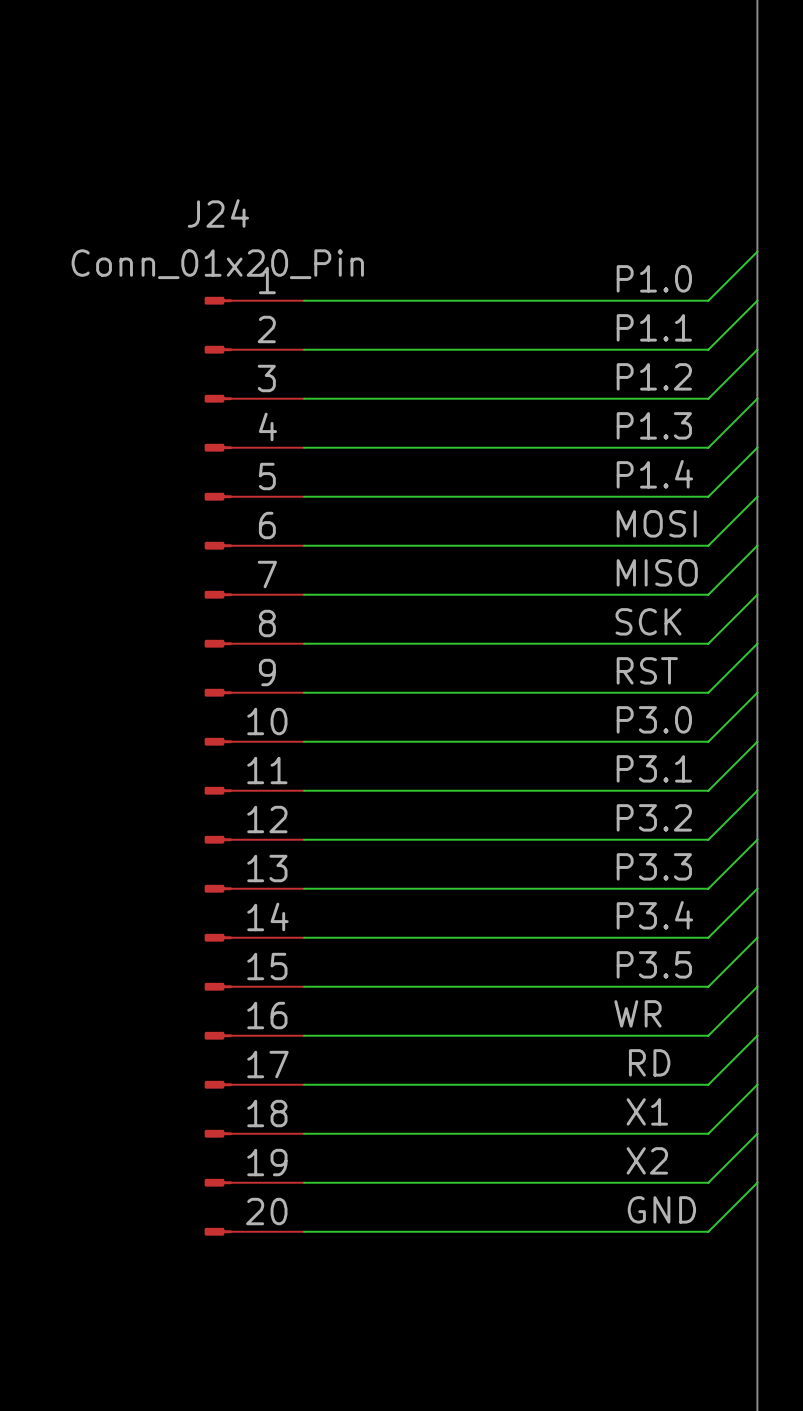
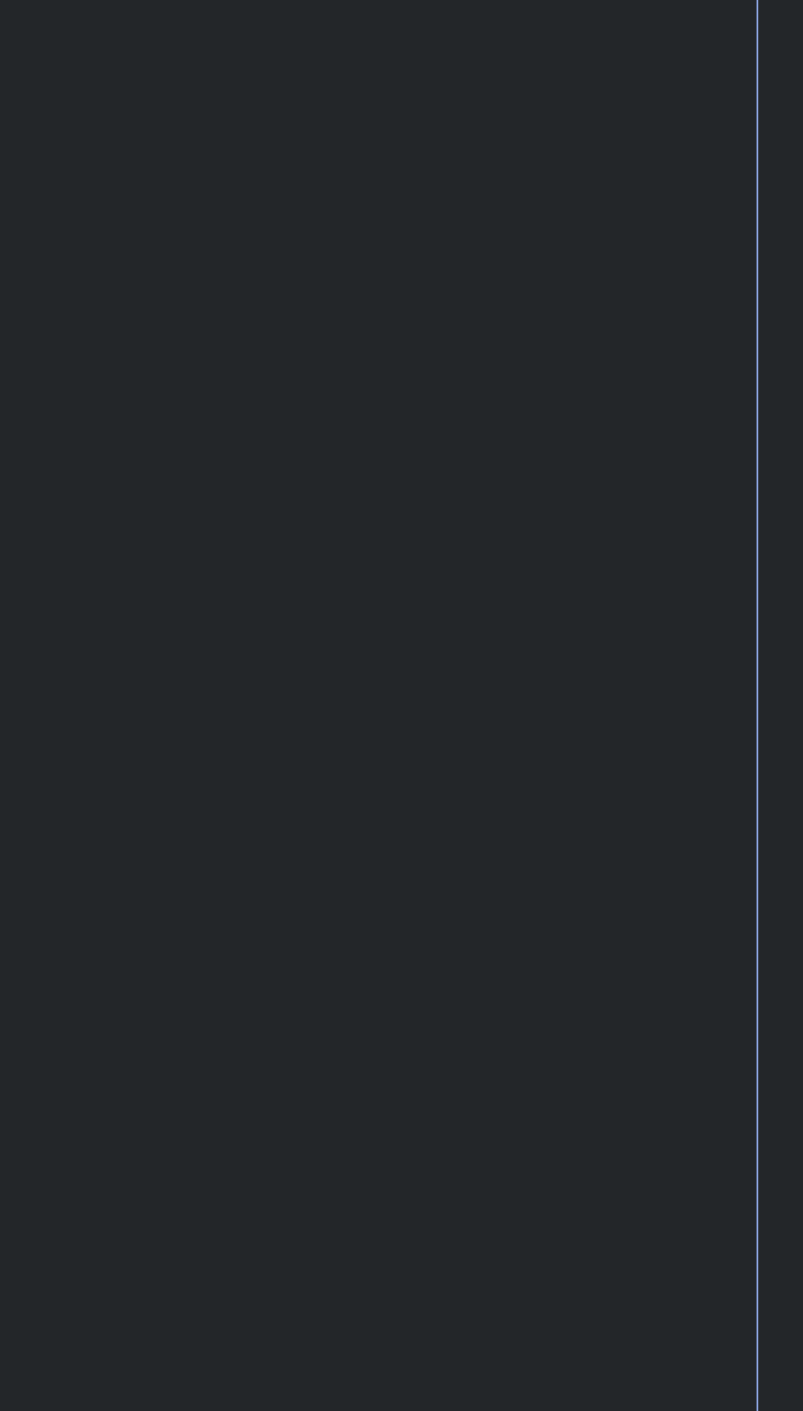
wire: (757, 251) (708, 300) (304, 300) -> none
label: P1.0 (654, 278) -> none
wire: (757, 300) (708, 349) (304, 349) -> none
label: P1.1 (654, 327) -> none
wire: (757, 349) (708, 398) (304, 398) -> none
label: P1.2 (654, 376) -> none
wire: (757, 398) (708, 447) (304, 447) -> none
label: P1.3 (654, 425) -> none
wire: (757, 447) (708, 496) (304, 496) -> none
label: P1.4 (654, 474) -> none
wire: (757, 496) (708, 545) (304, 545) -> none
label: MOSI (656, 523) -> none
wire: (757, 545) (708, 594) (304, 594) -> none
label: MISO (657, 572) -> none
wire: (757, 594) (708, 643) (304, 643) -> none
label: SCK (648, 621) -> none
wire: (757, 643) (708, 692) (304, 692) -> none
label: RST (647, 670) -> none
wire: (757, 692) (708, 741) (304, 741) -> none
label: P3.0 (654, 719) -> none
wire: (757, 741) (708, 790) (304, 790) -> none
J24: Conn_01x20_Pin (254, 766) -> none
label: P3.1 (654, 768) -> none
wire: (757, 790) (708, 839) (304, 839) -> none
label: P3.2 (654, 817) -> none
wire: (757, 839) (708, 888) (304, 888) -> none
label: P3.3 (654, 866) -> none
wire: (757, 888) (708, 937) (304, 937) -> none
label: P3.4 (654, 915) -> none
wire: (757, 937) (708, 986) (304, 986) -> none
label: P3.5 (654, 964) -> none
wire: (757, 986) (708, 1035) (304, 1035) -> none
label: WR (637, 1013) -> none
wire: (757, 1035) (708, 1084) (304, 1084) -> none
label: RD (649, 1062) -> none
wire: (757, 1084) (708, 1133) (304, 1133) -> none
label: X1 (647, 1111) -> none
wire: (757, 1133) (708, 1182) (304, 1182) -> none
label: X2 (647, 1160) -> none
wire: (757, 1182) (708, 1231) (304, 1231) -> none
label: GND (661, 1209) -> none

